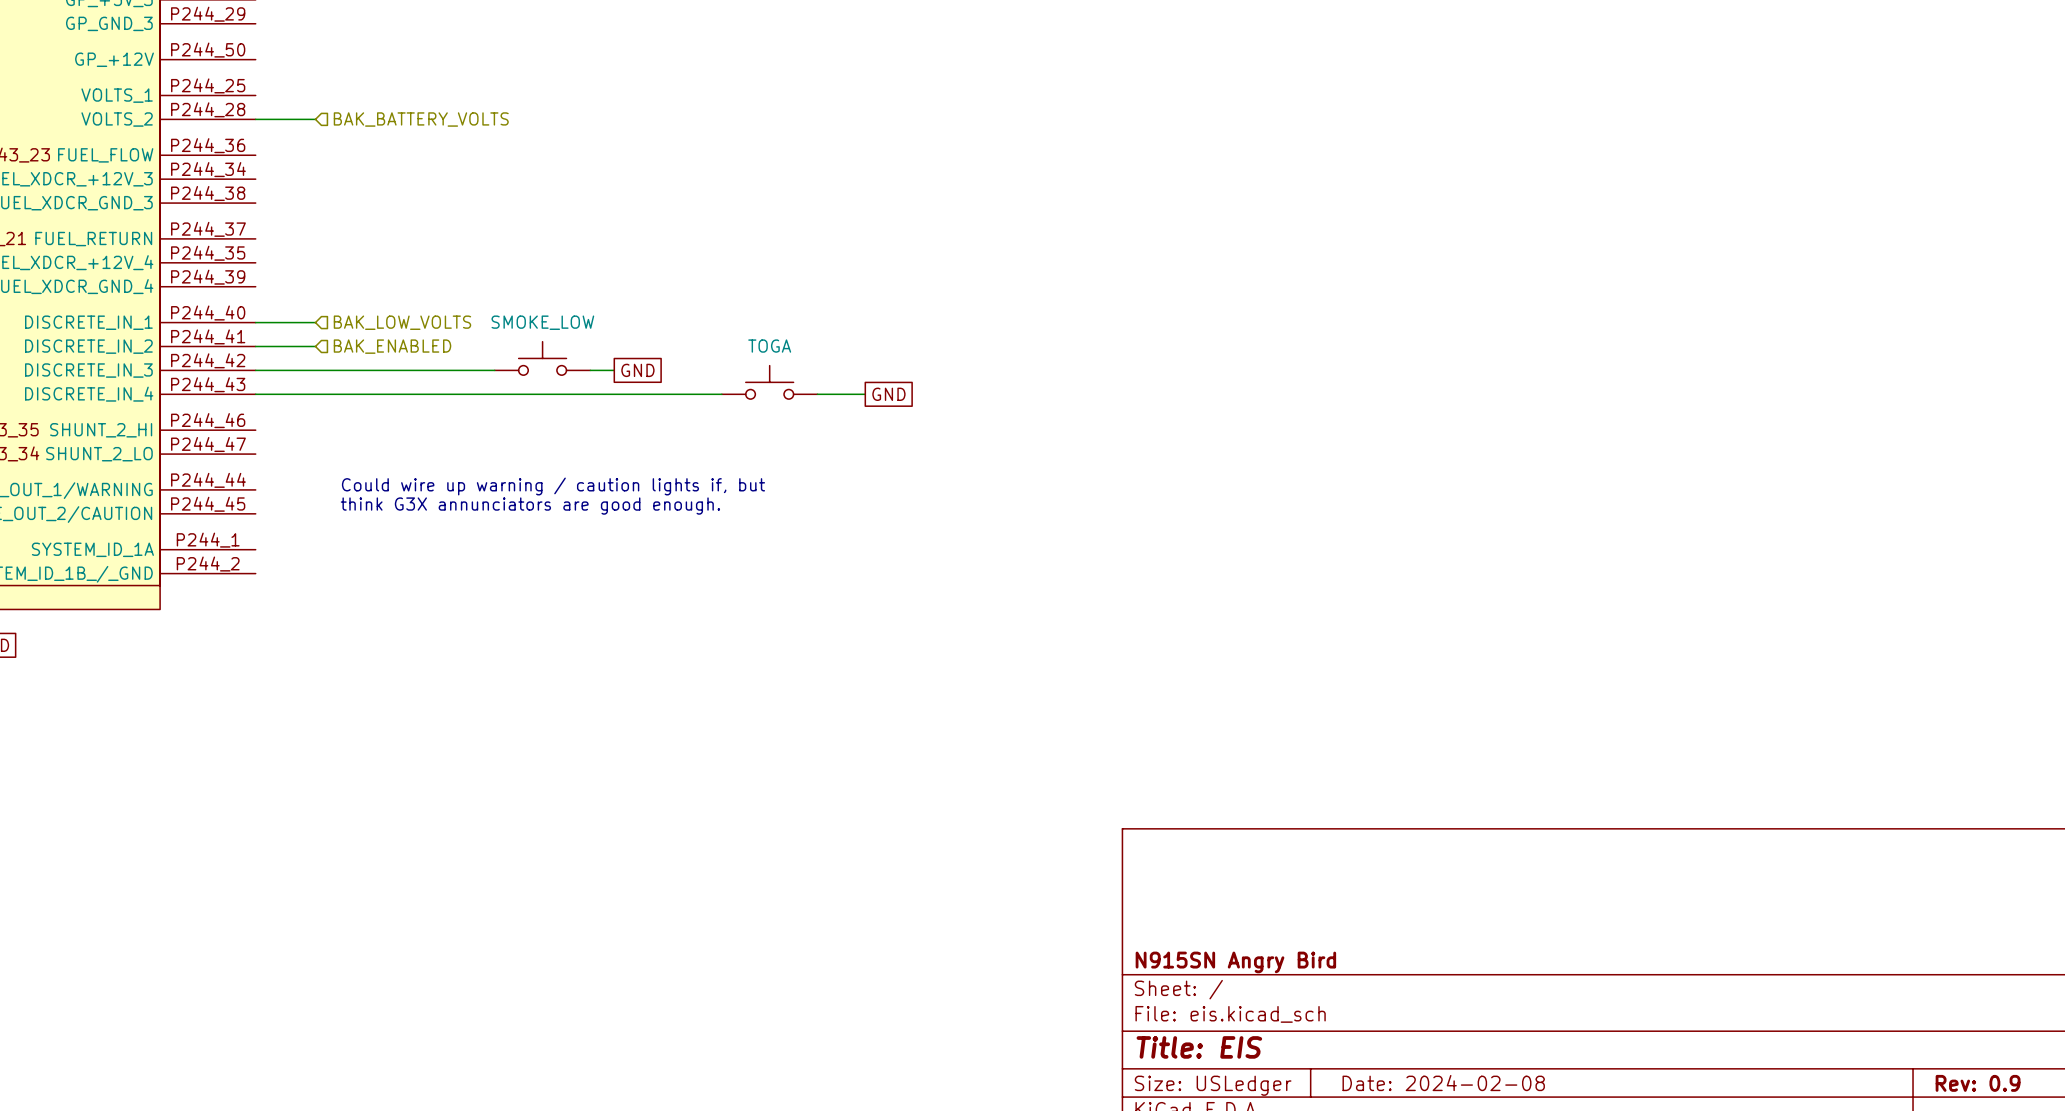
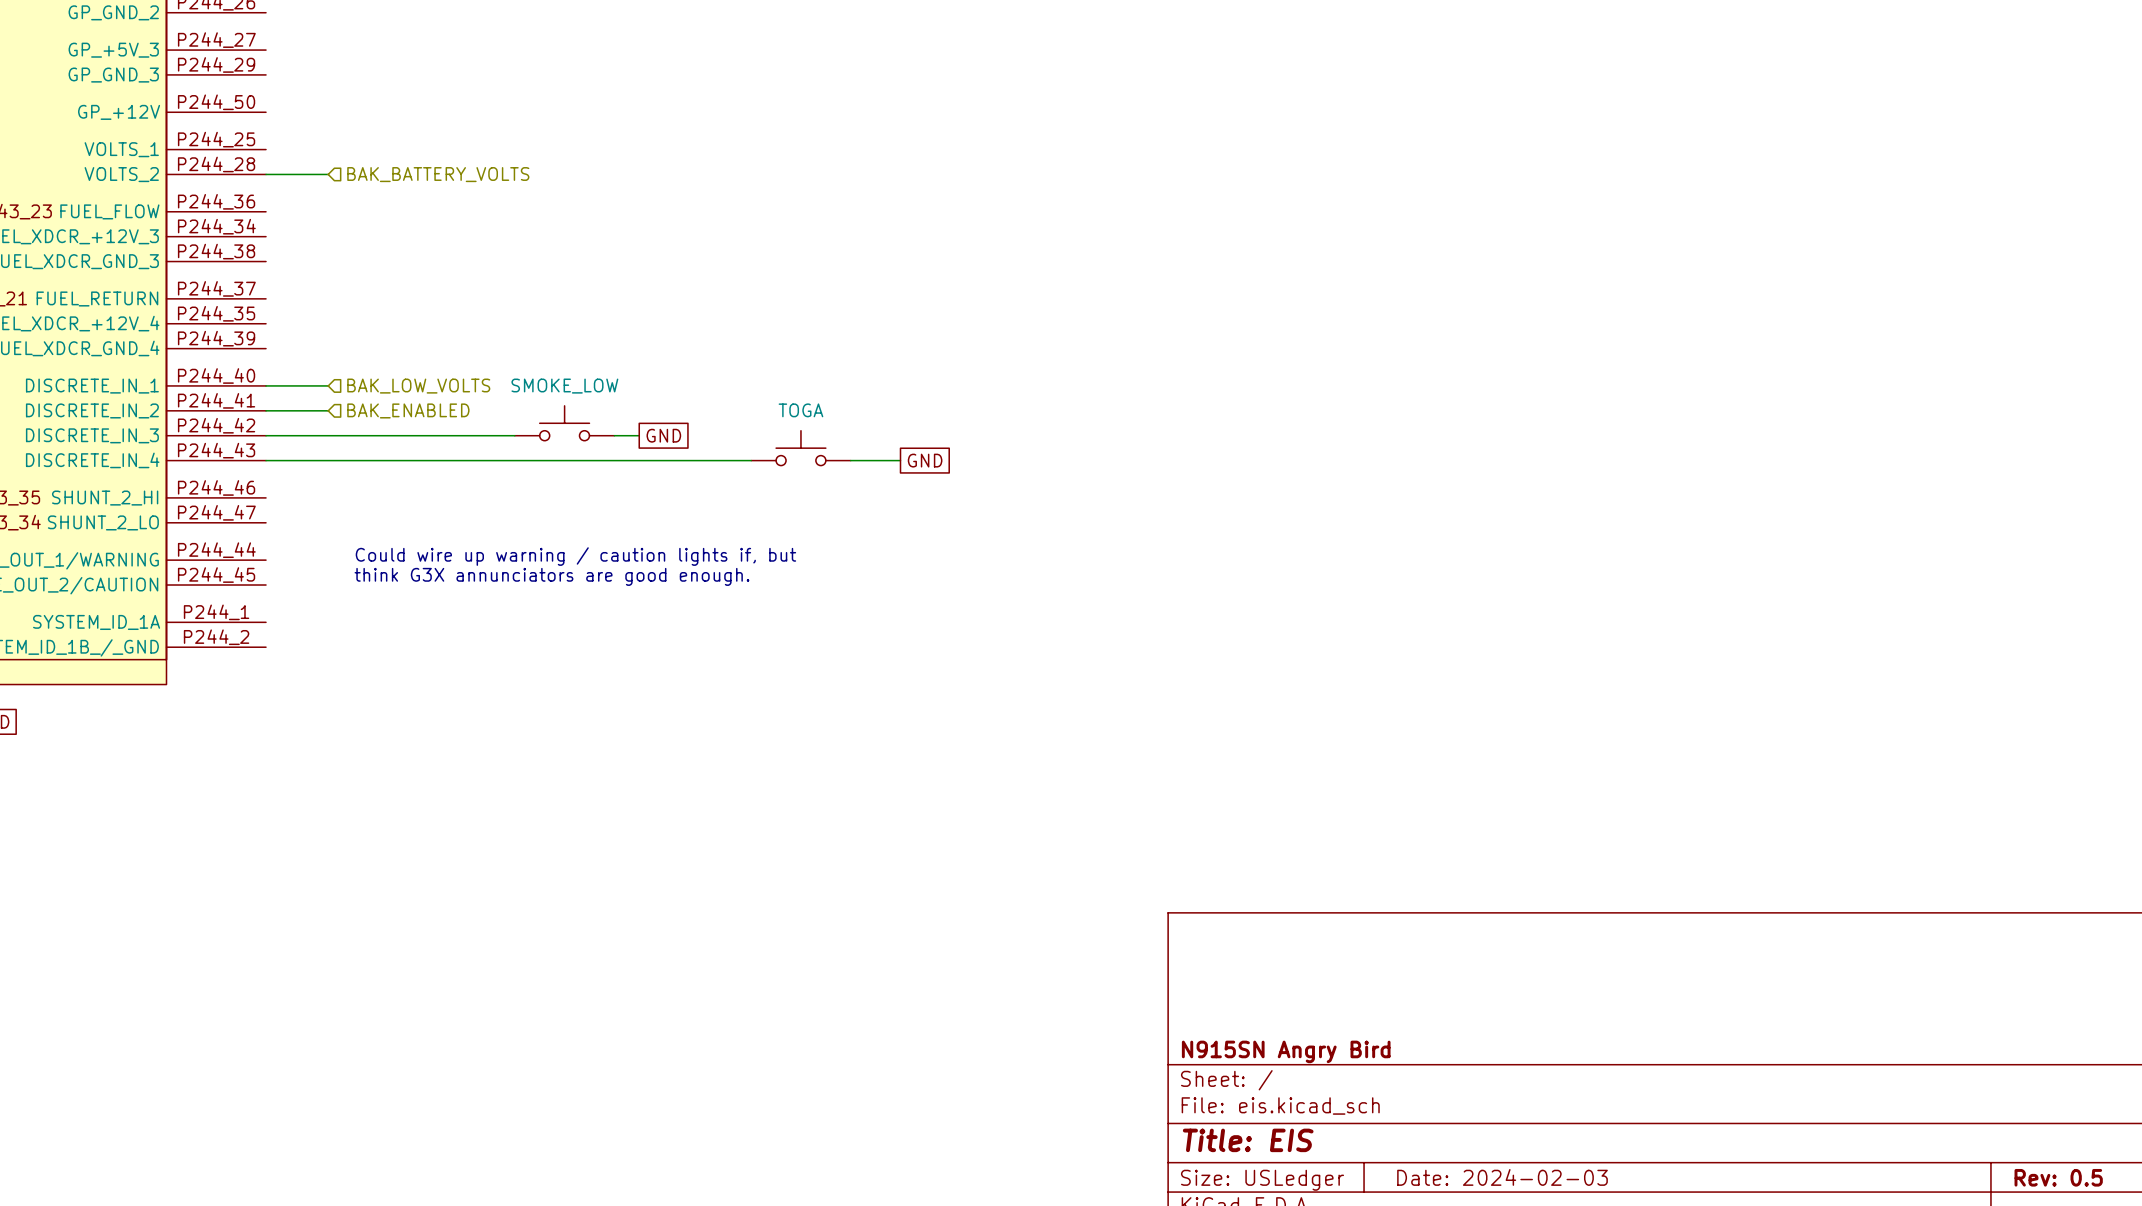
title block: Date: 2024-02-08 (1443, 1083) -> Date: 2024-02-03 (1502, 1177)
title block: Rev: 0.9 (1978, 1083) -> Rev: 0.5 (2058, 1177)

